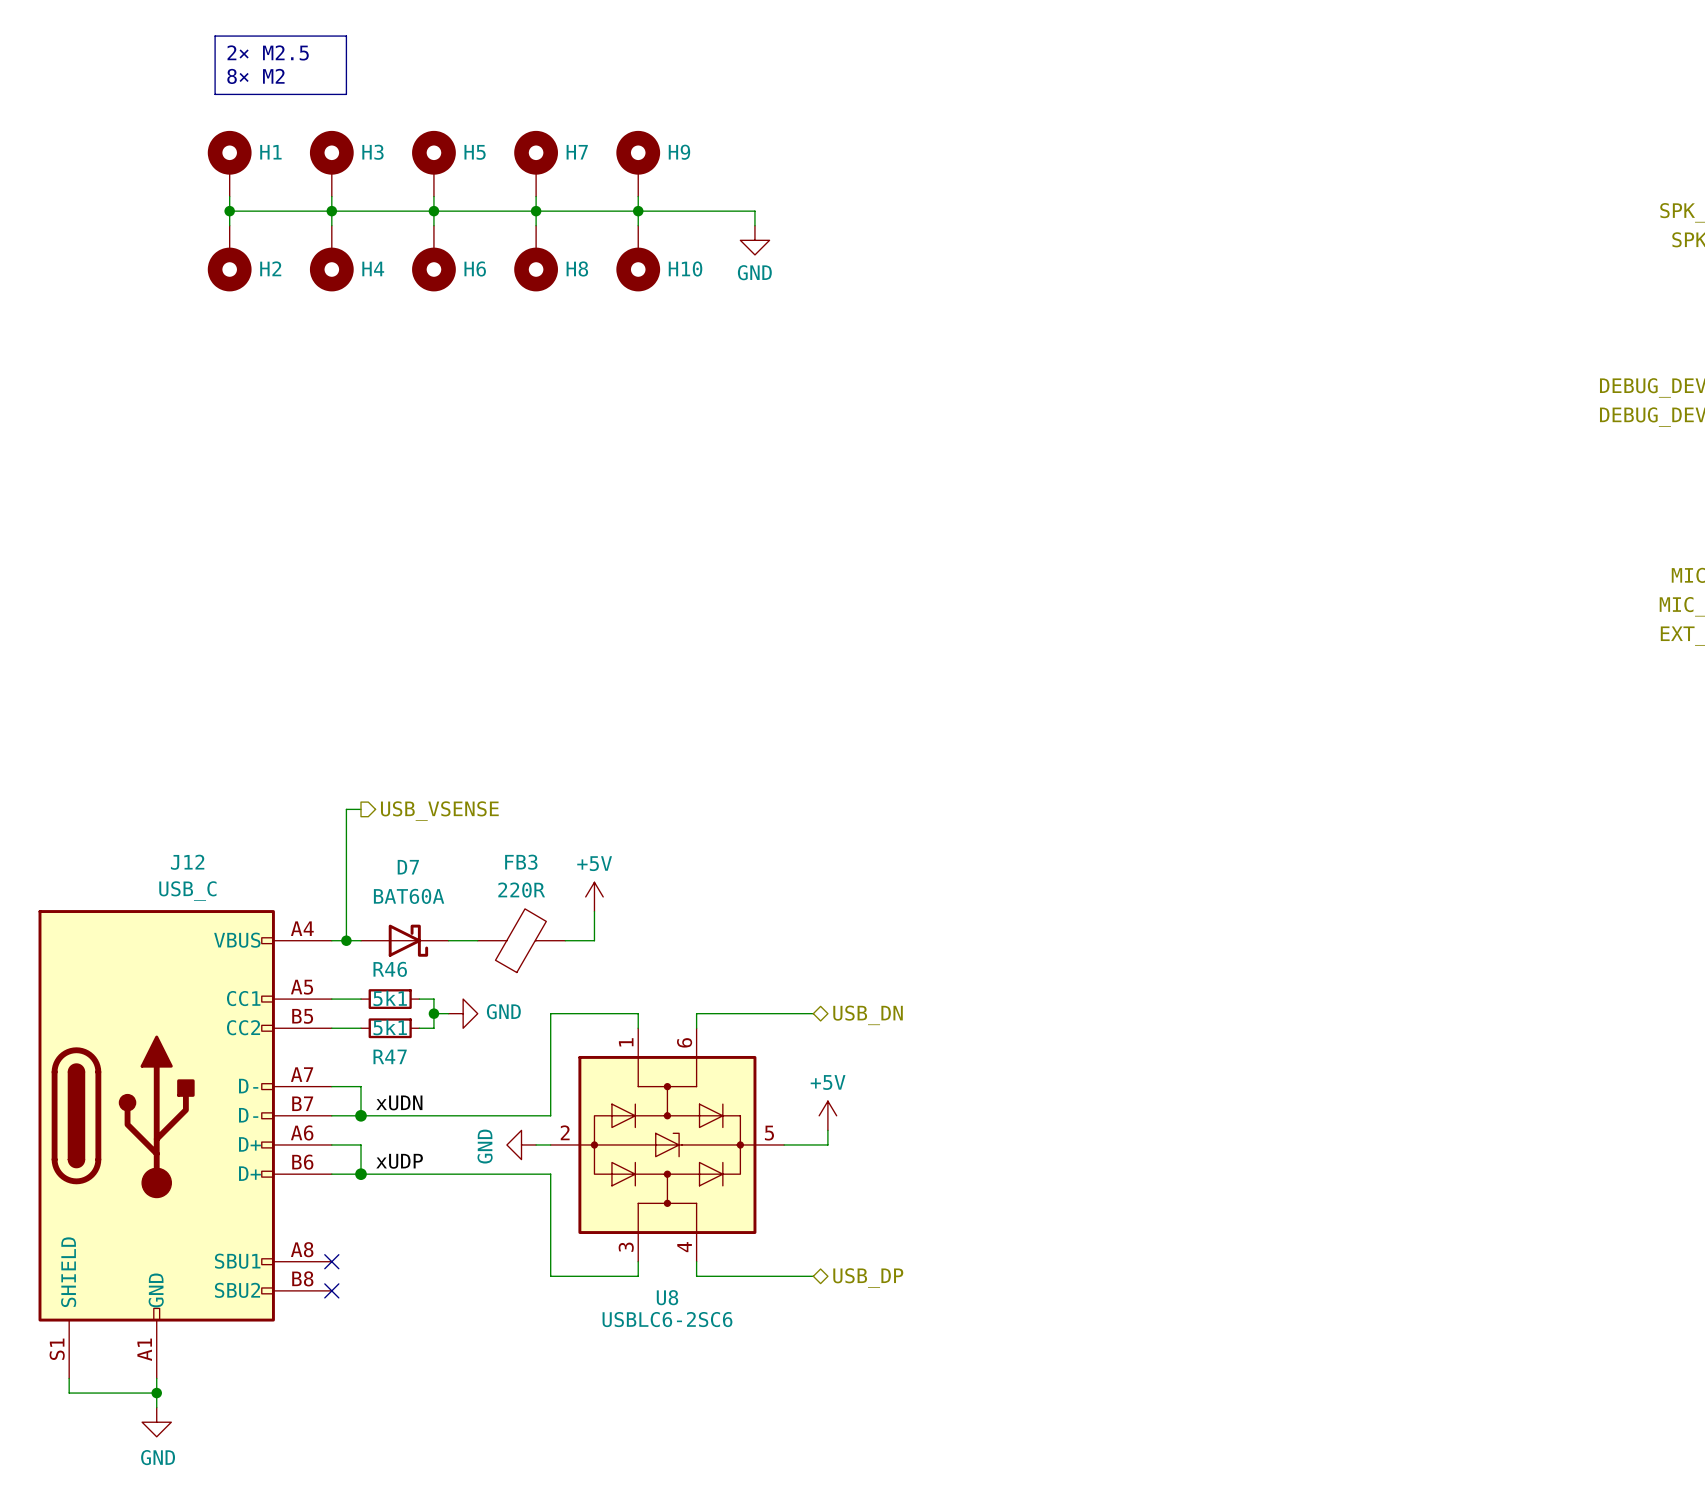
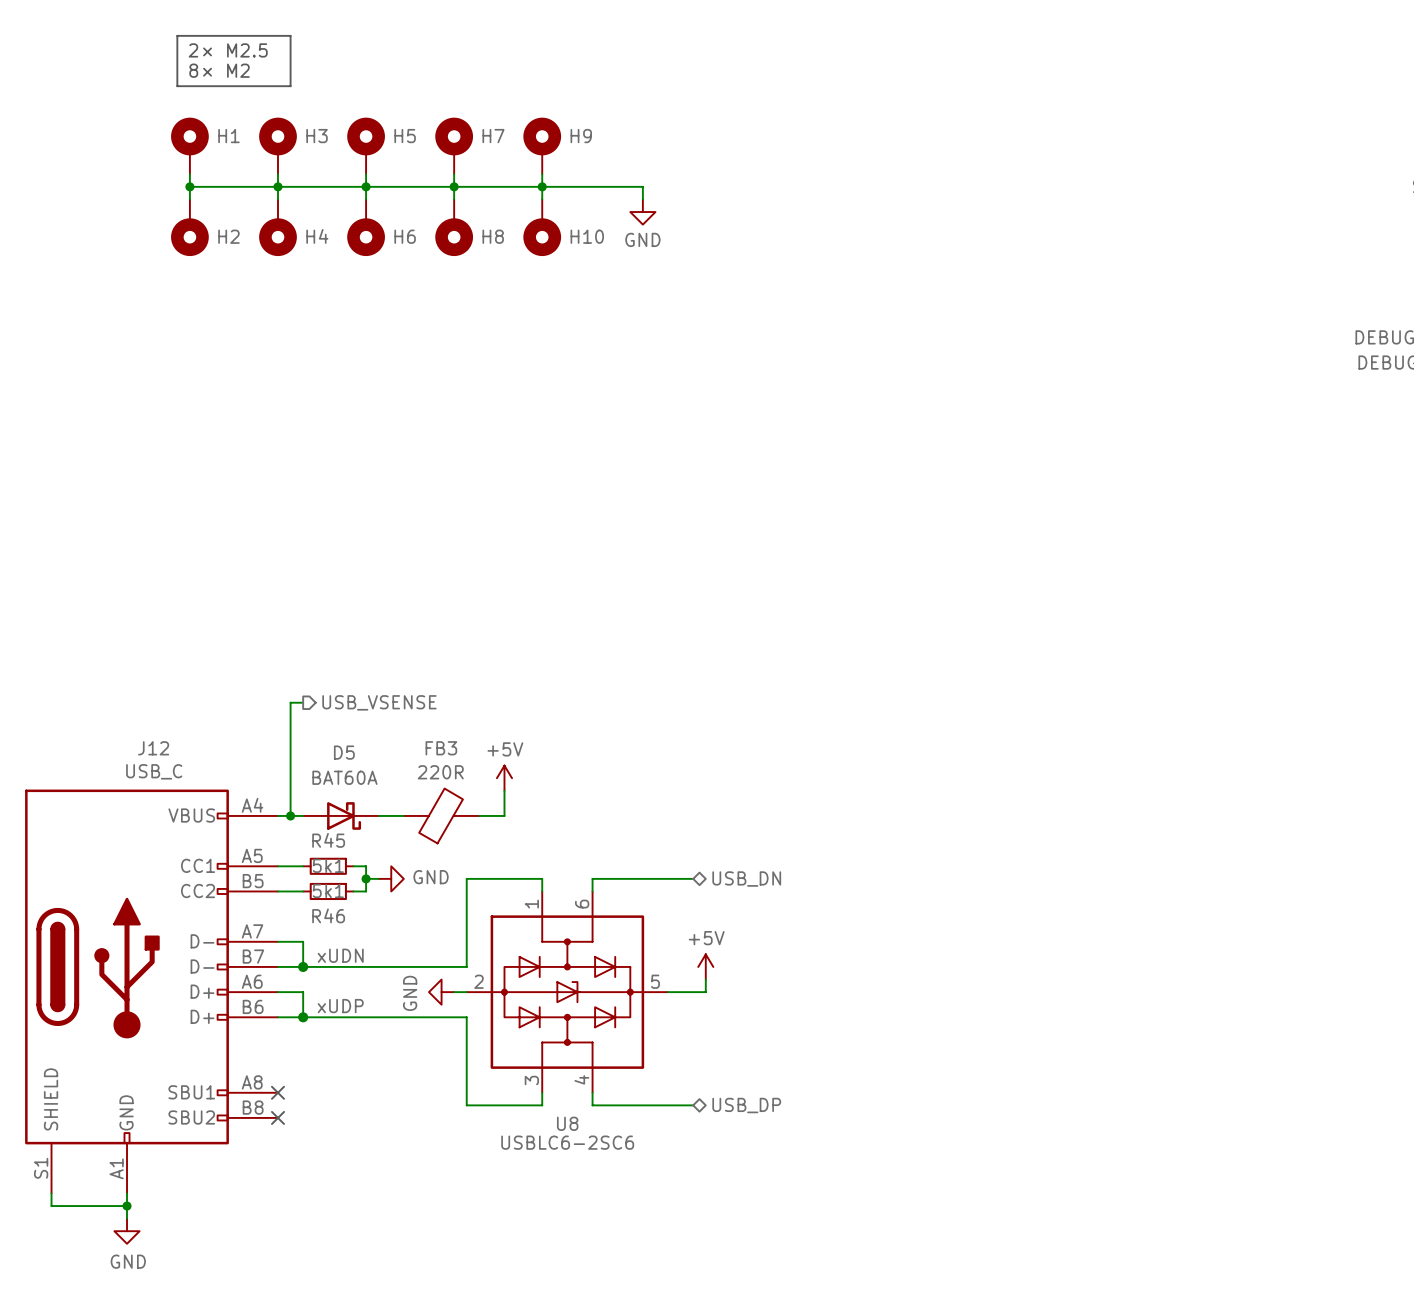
D7 name: D7 (408, 867) -> D5 (344, 752)
R46 name: R46 (390, 969) -> R45 (328, 840)
R47 name: R47 (390, 1056) -> R46 (328, 915)

